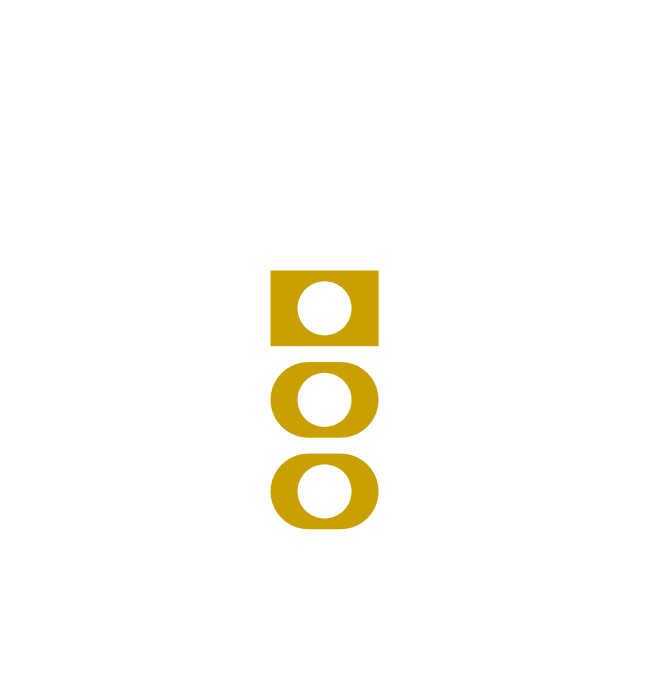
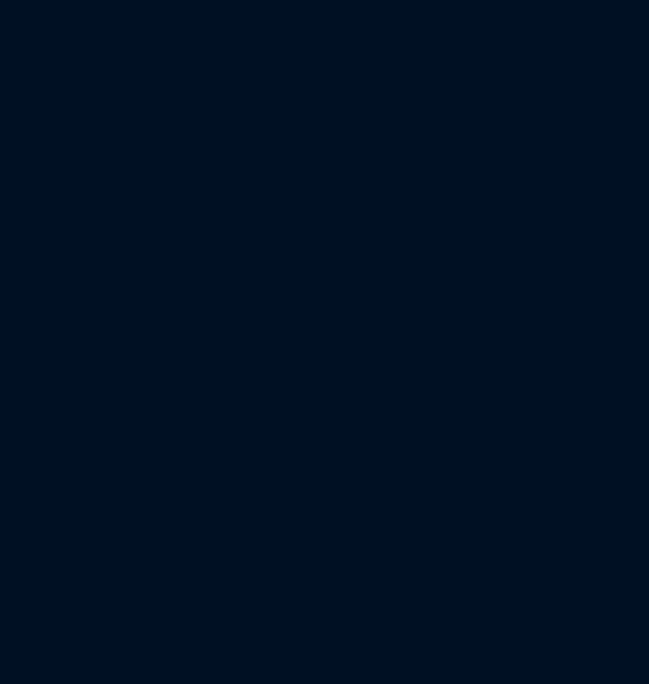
part: (324, 399) -> none

